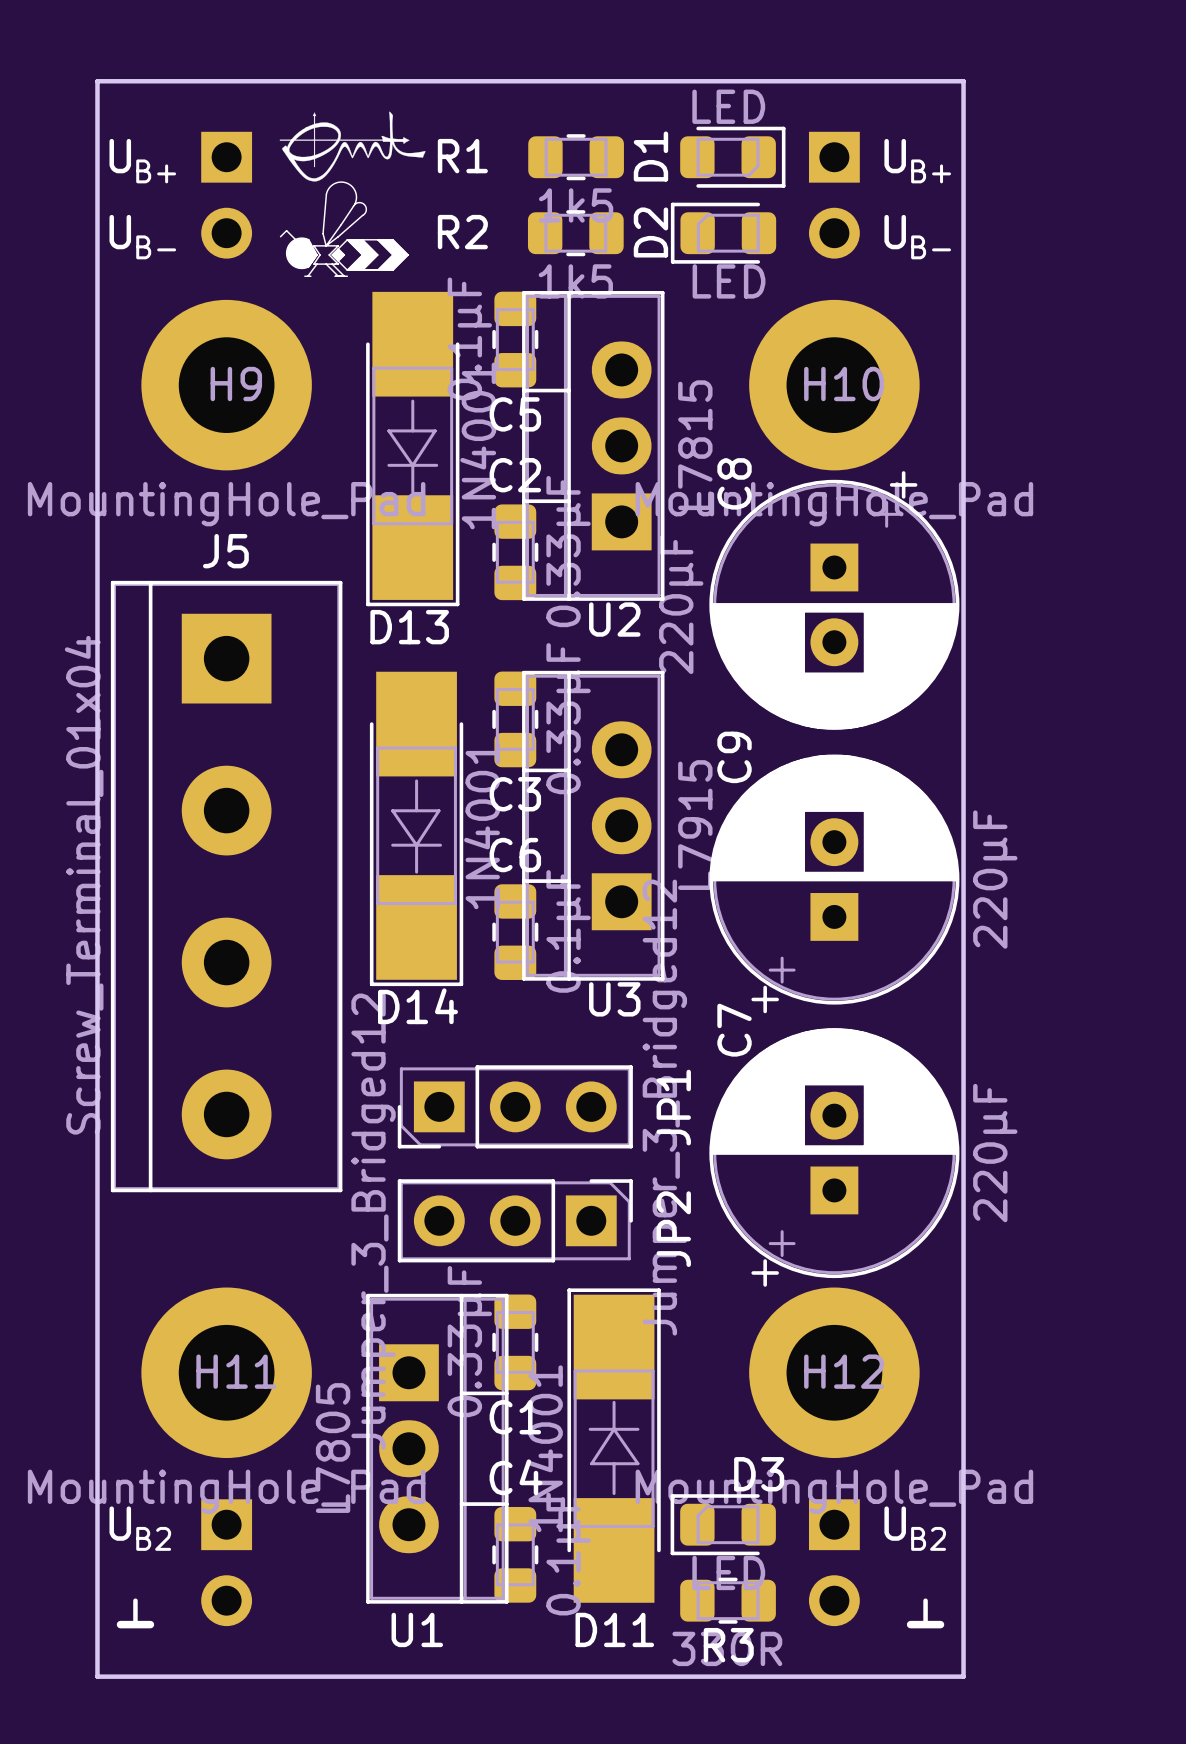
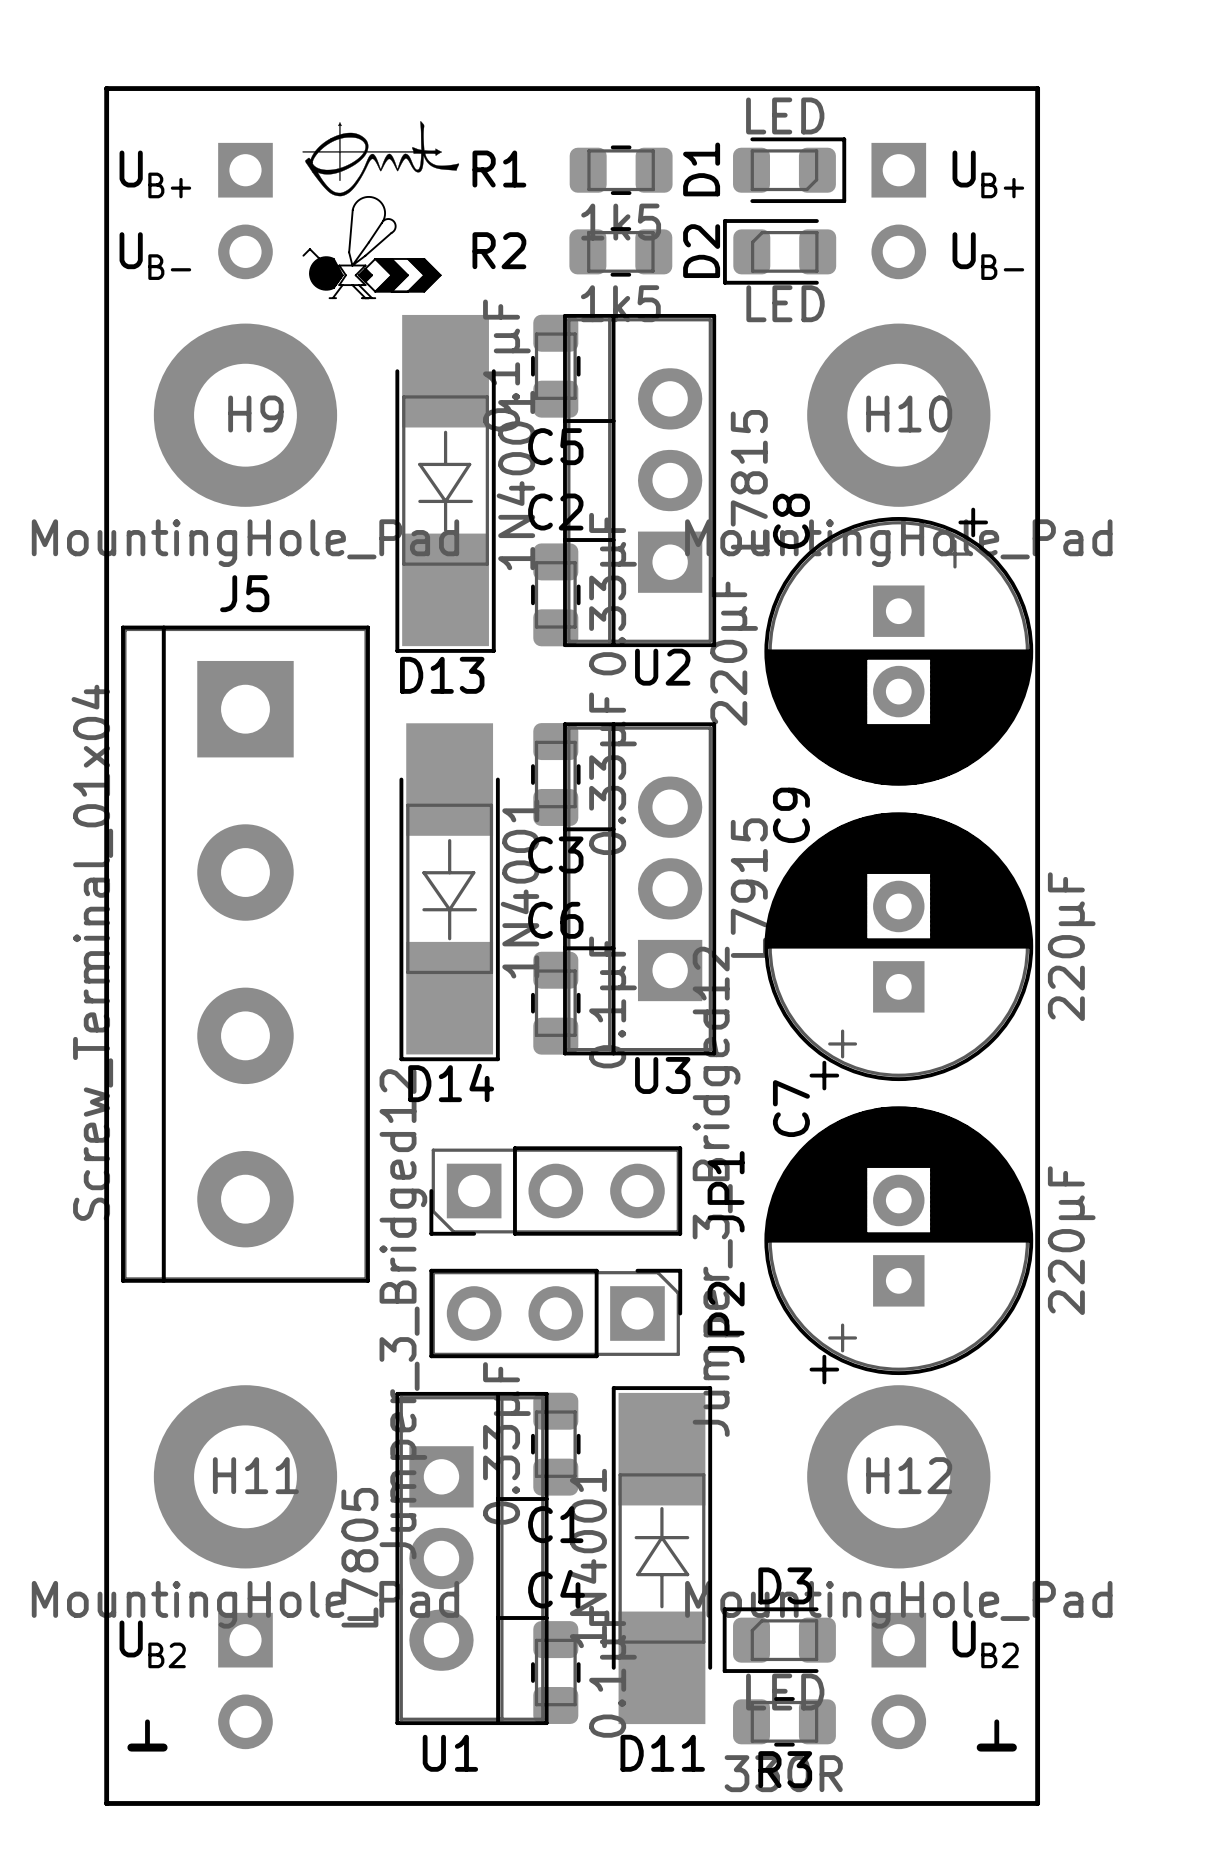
D3 name position: D3 (759, 1474) -> D3 (785, 1585)

